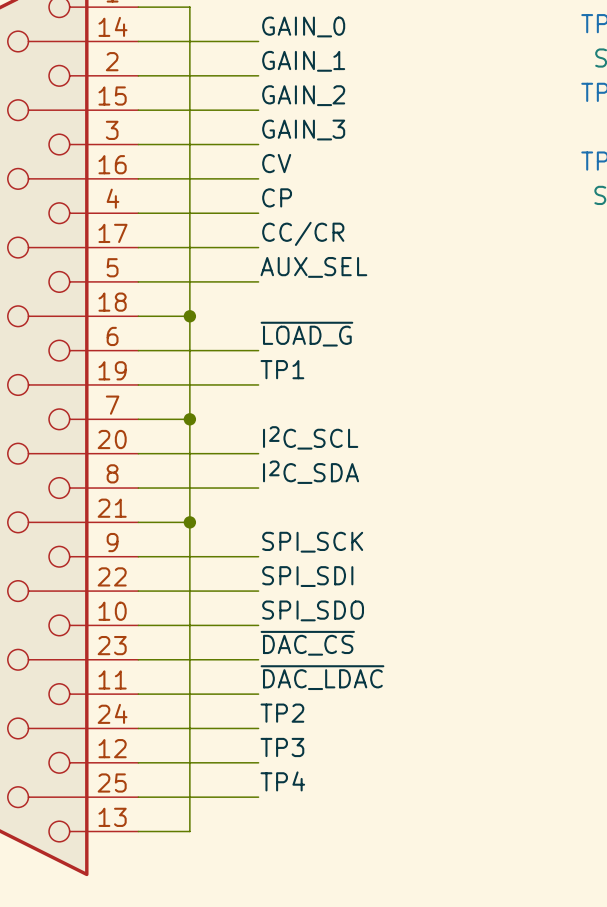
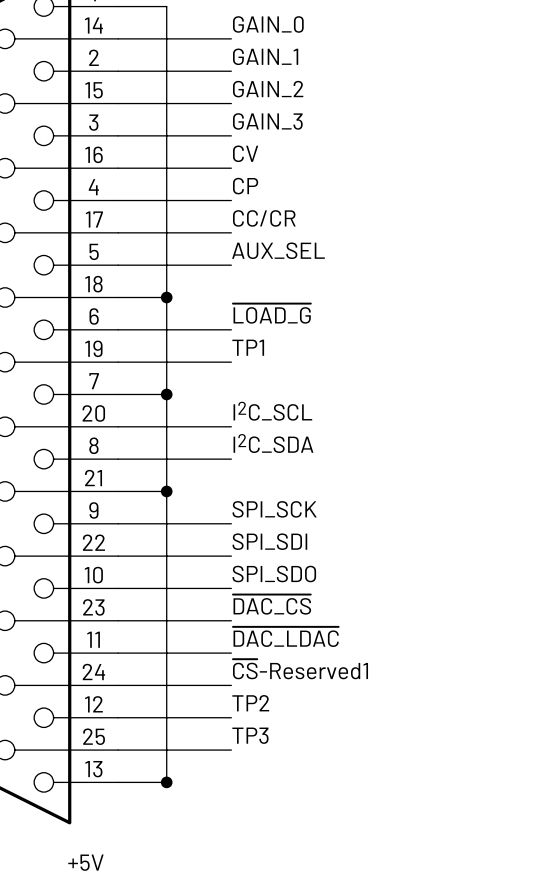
label: TP2 (282, 713) -> ~{CS}-Reserved1 (300, 669)
label: TP3 (282, 747) -> TP2 (250, 703)
label: TP4 (282, 781) -> TP3 (250, 735)
junction: none -> (166, 782)

